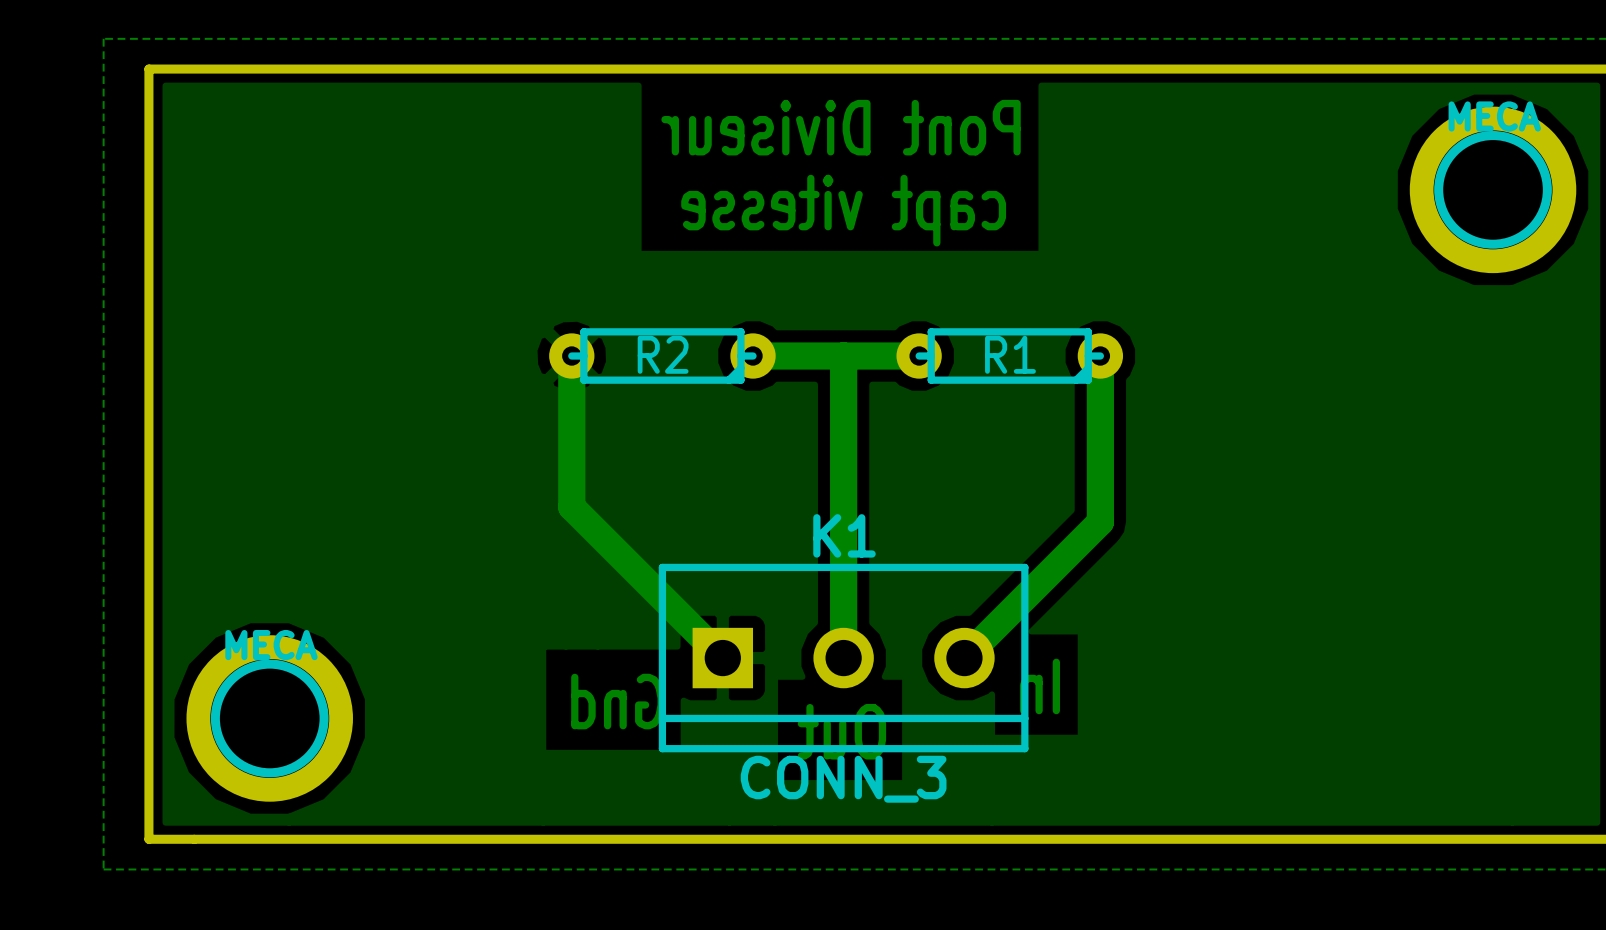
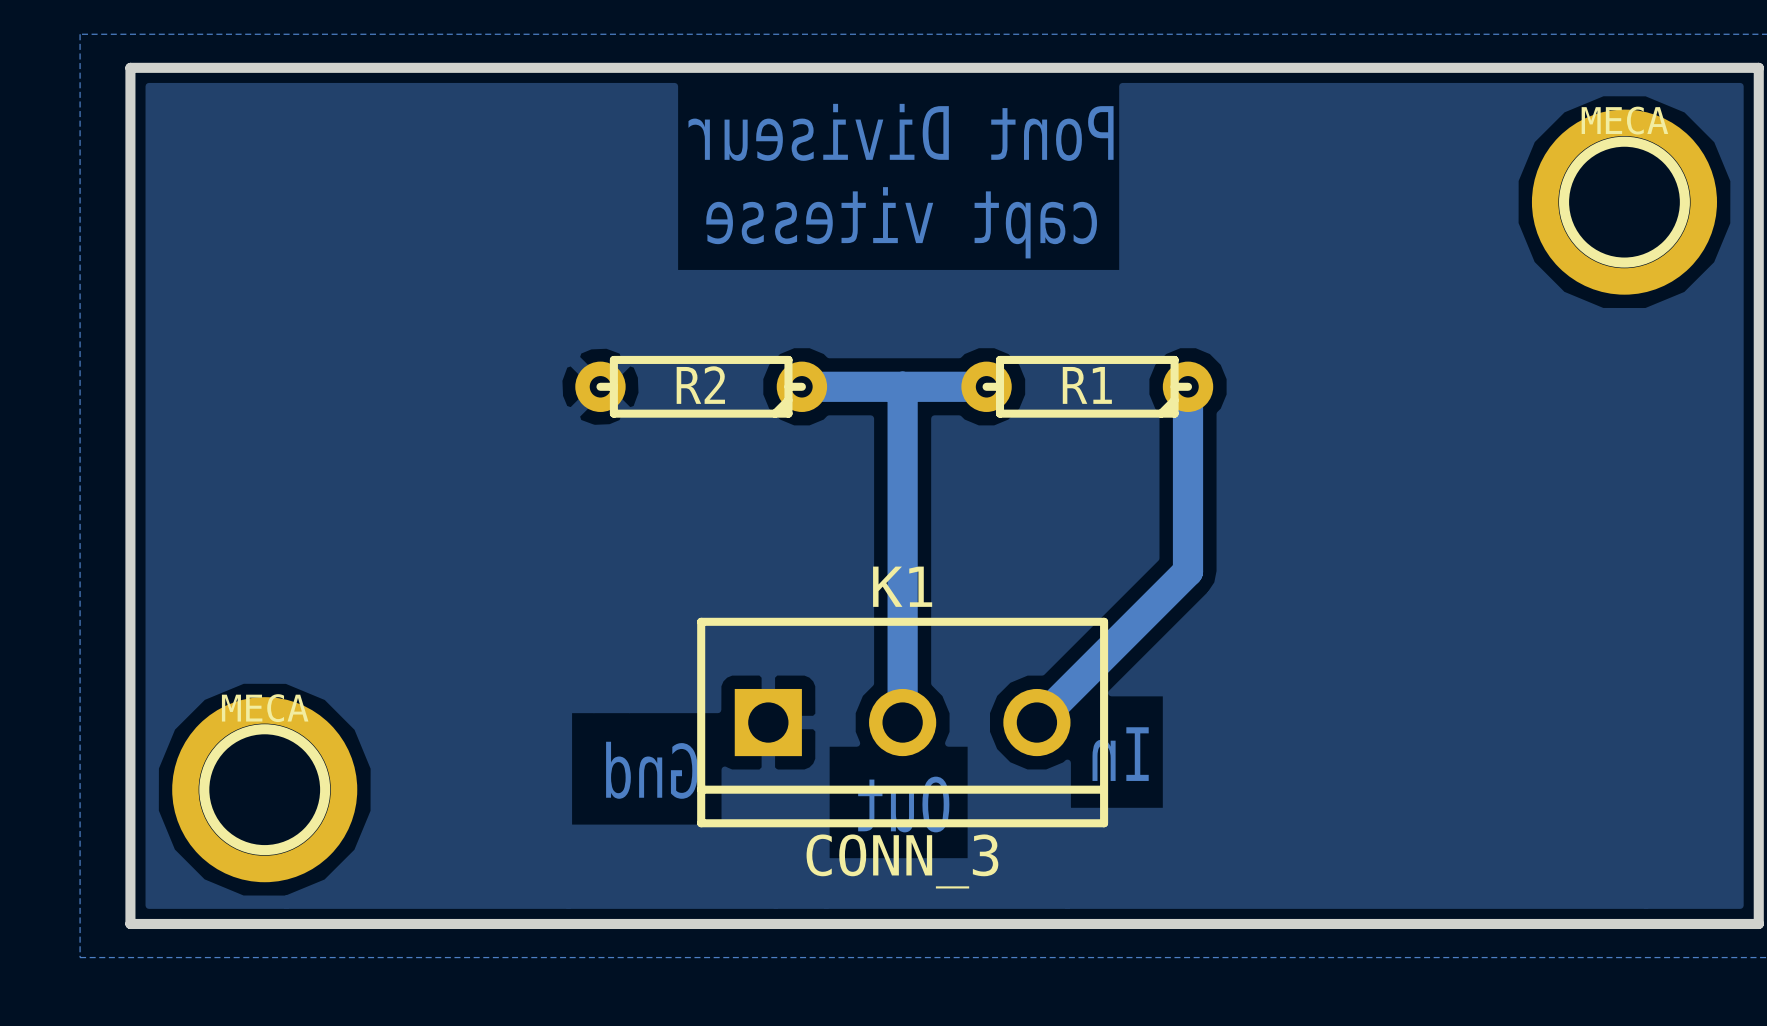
bottom track: (571, 356) (571, 507) (722, 658) -> none

